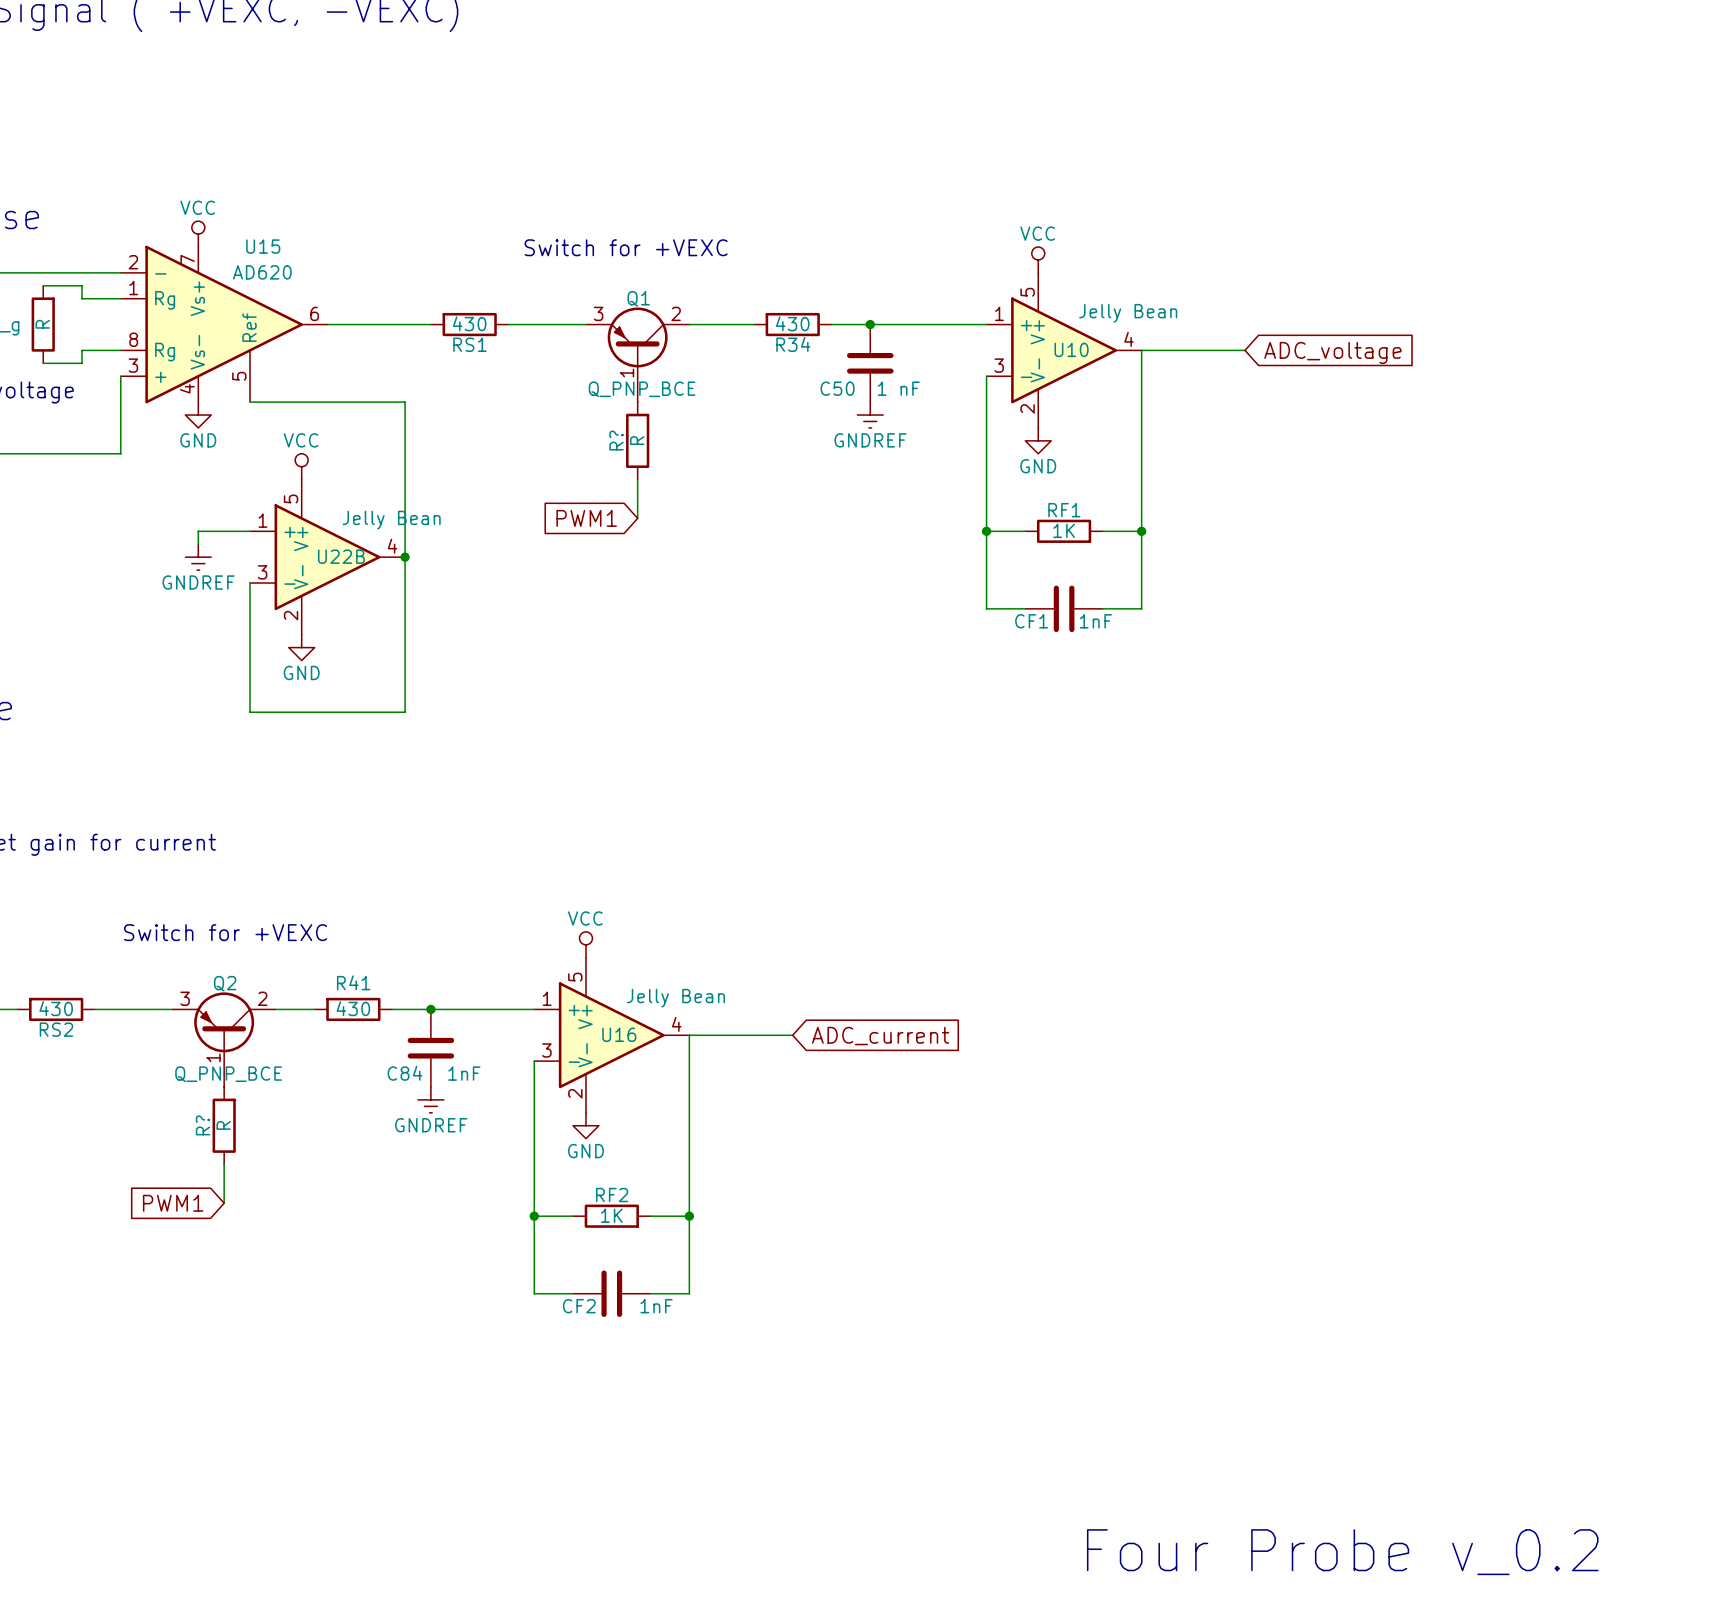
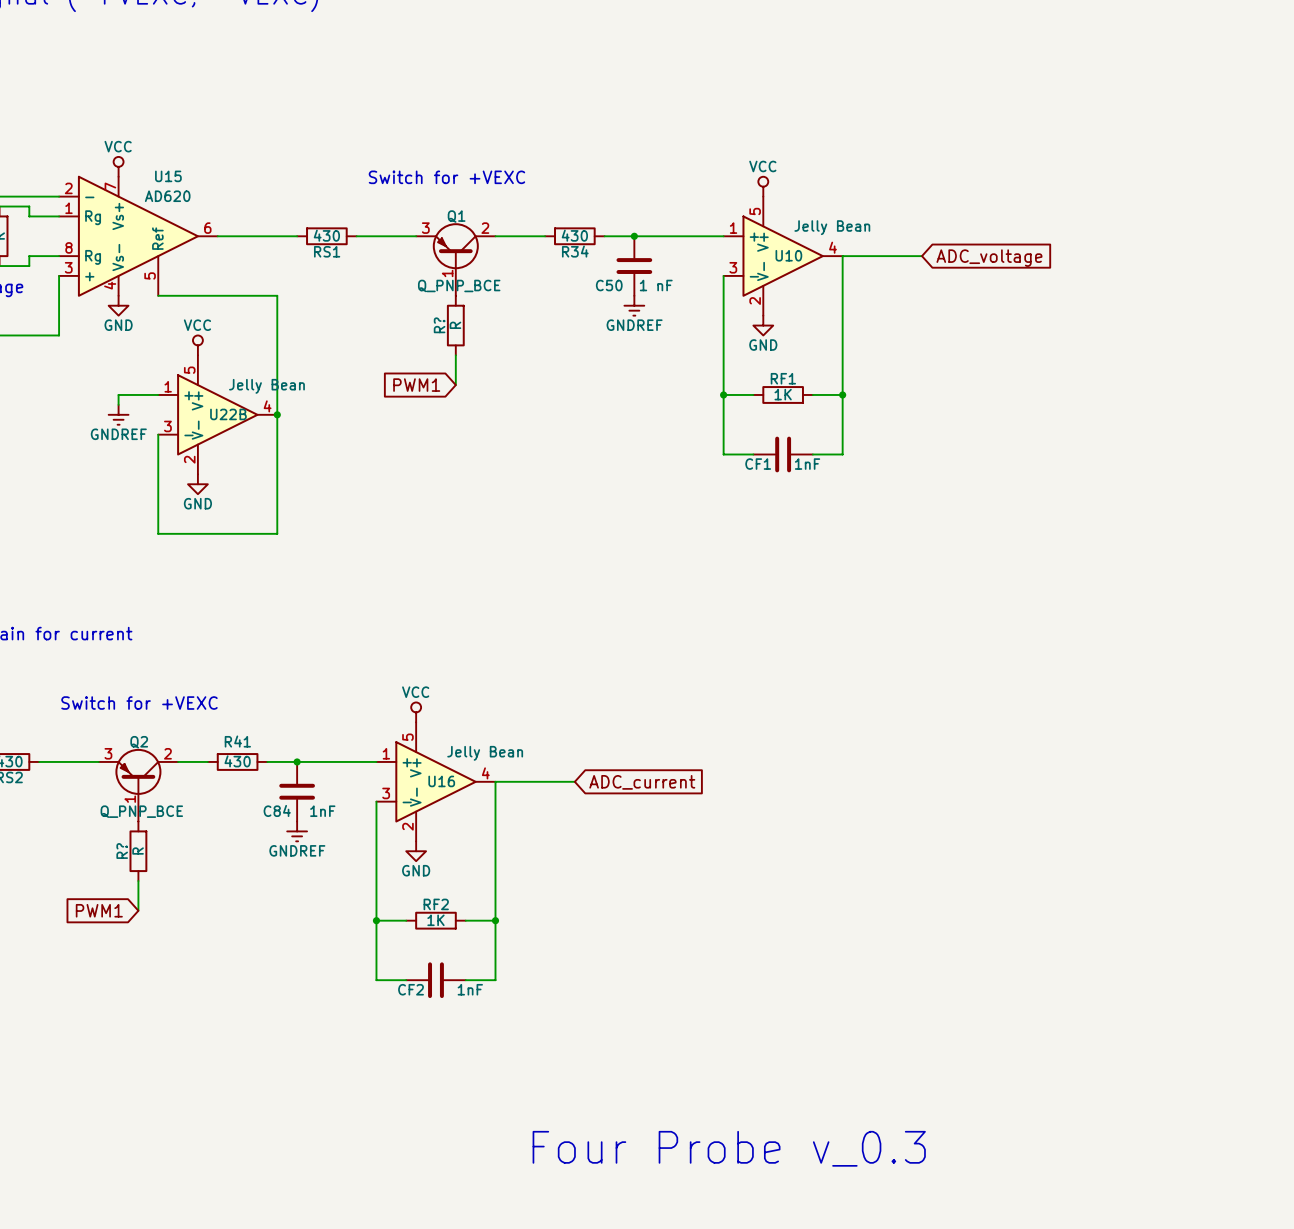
text: none -> Four Probe v_0.3 (729, 1148)
text: Four Probe v_0.2 (1342, 1552) -> none

